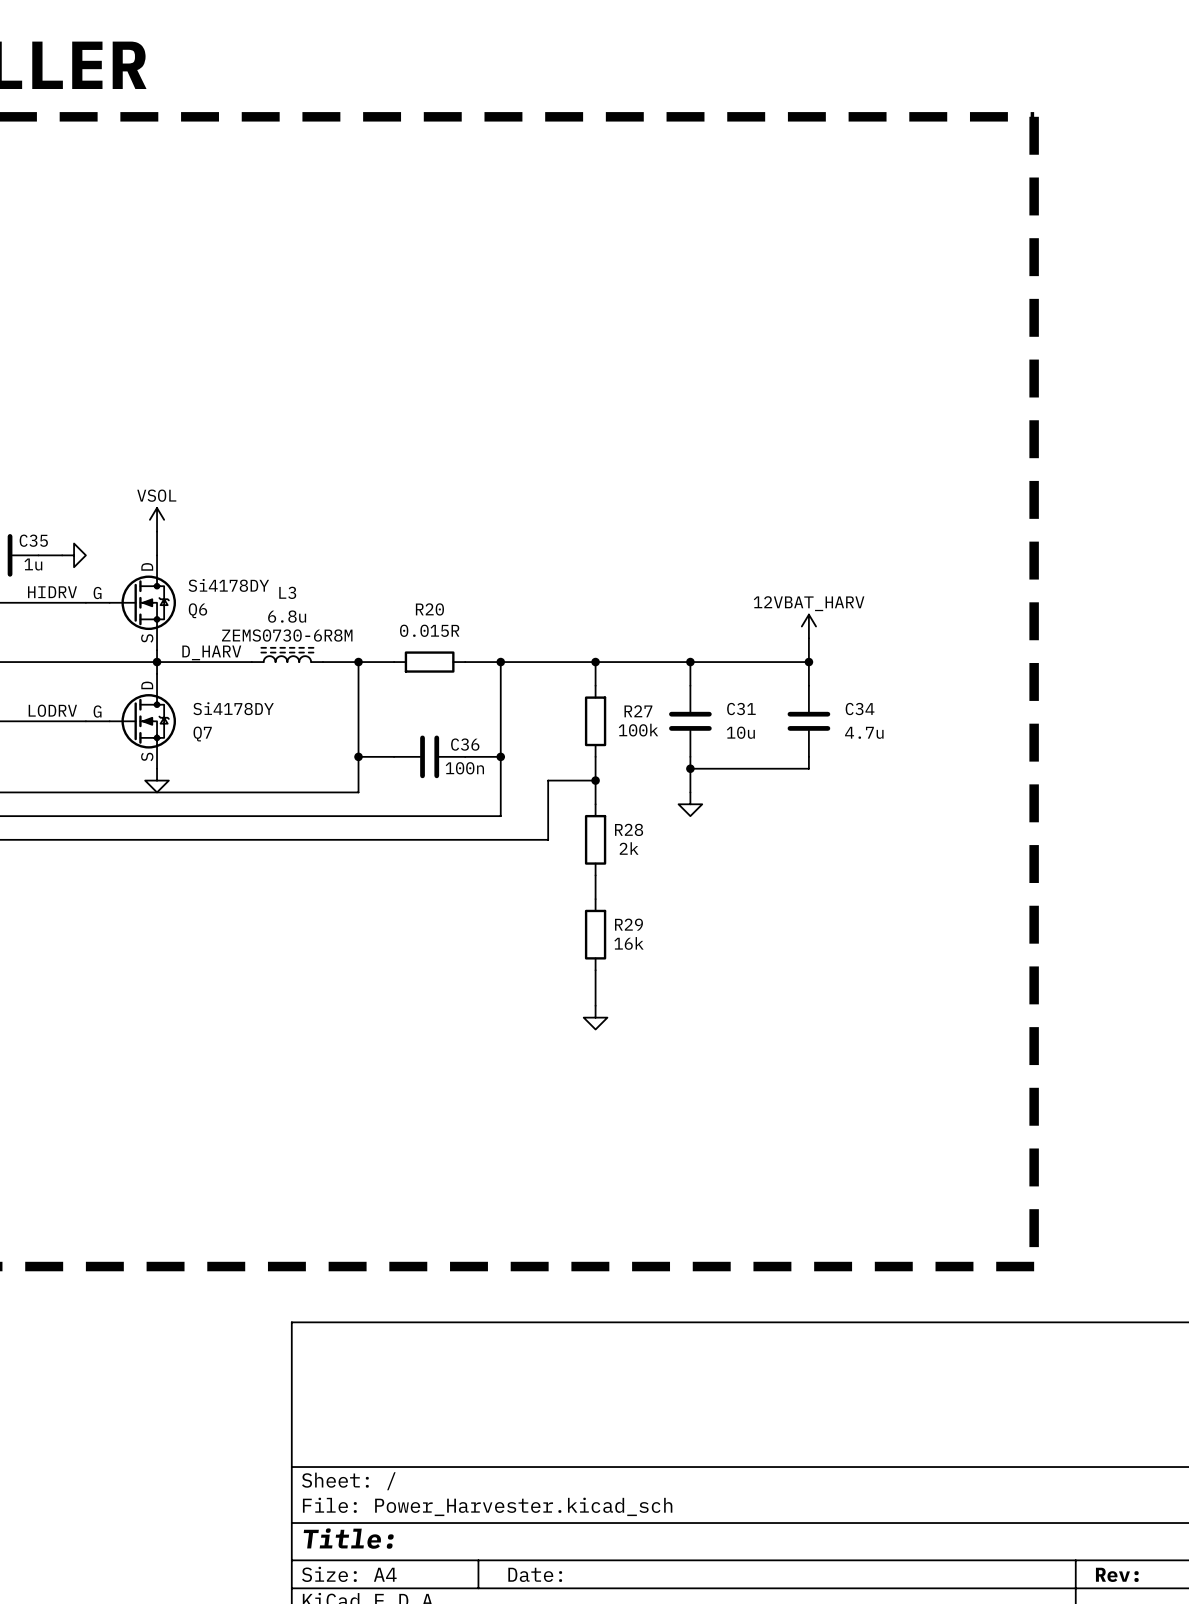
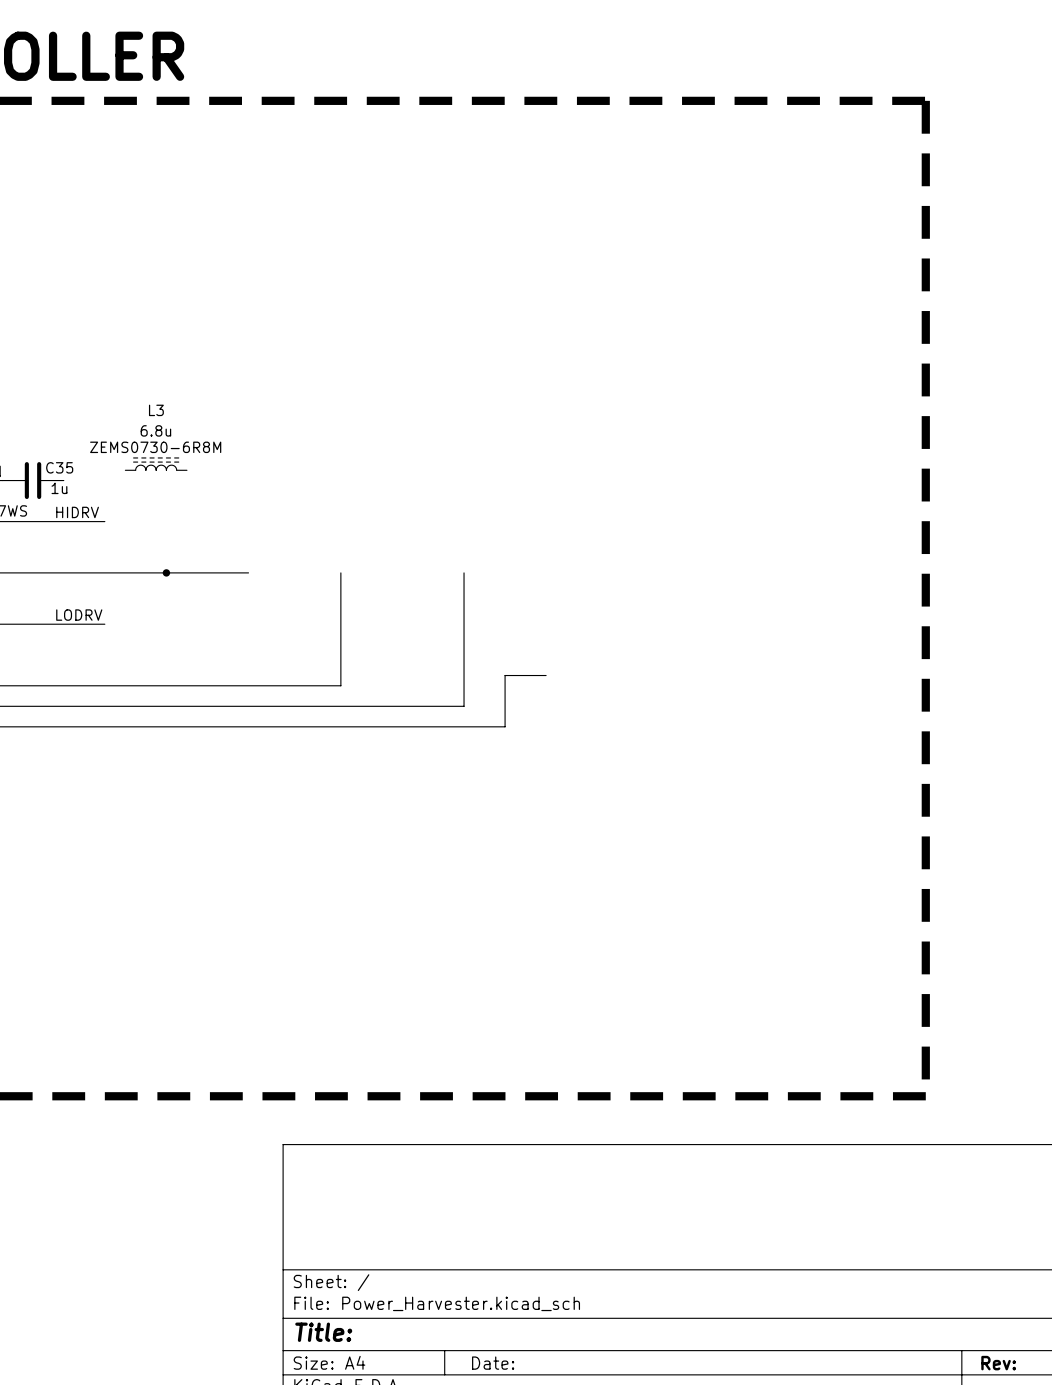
power symbol: VSOL (157, 519) -> none
wire: (157, 531) (157, 555) -> none
wire: (38, 555) (62, 555) -> none
power symbol: (74, 555) -> none
Q6: Si4178DY (130, 602) -> none
power symbol: 12VBAT_HARV (808, 626) -> none
wire: (808, 638) (808, 685) -> none
wire: (157, 650) (157, 673) -> none
label: D_HARV (211, 652) -> none
L3 position: (287, 654) -> (156, 464)
wire: (322, 662) (394, 662) -> none
junction: (358, 662) -> none
R20: 0.015R (429, 662) -> none
wire: (465, 662) (808, 662) -> none
junction: (500, 662) -> none
wire: (595, 662) (595, 685) -> none
junction: (595, 662) -> none
wire: (690, 662) (690, 685) -> none
junction: (690, 662) -> none
junction: (808, 662) -> none
Q7: Si4178DY (130, 721) -> none
R27: 100k (595, 721) -> none
C31: 10u (690, 721) -> none
C34: 4.7u (808, 721) -> none
wire: (358, 756) (394, 756) -> none
junction: (358, 756) -> none
C36: 100n (429, 756) -> none
wire: (465, 756) (500, 756) -> none
junction: (500, 756) -> none
wire: (595, 756) (595, 804) -> none
wire: (690, 756) (690, 792) -> none
wire: (808, 756) (808, 768) (690, 768) -> none
junction: (690, 768) -> none
power symbol: (157, 780) -> none
junction: (595, 780) -> none
power symbol: (690, 804) -> none
R28: 2k (595, 839) -> none
wire: (595, 875) (595, 899) -> none
R29: 16k (595, 934) -> none
wire: (595, 970) (595, 1005) -> none
power symbol: (595, 1017) -> none

